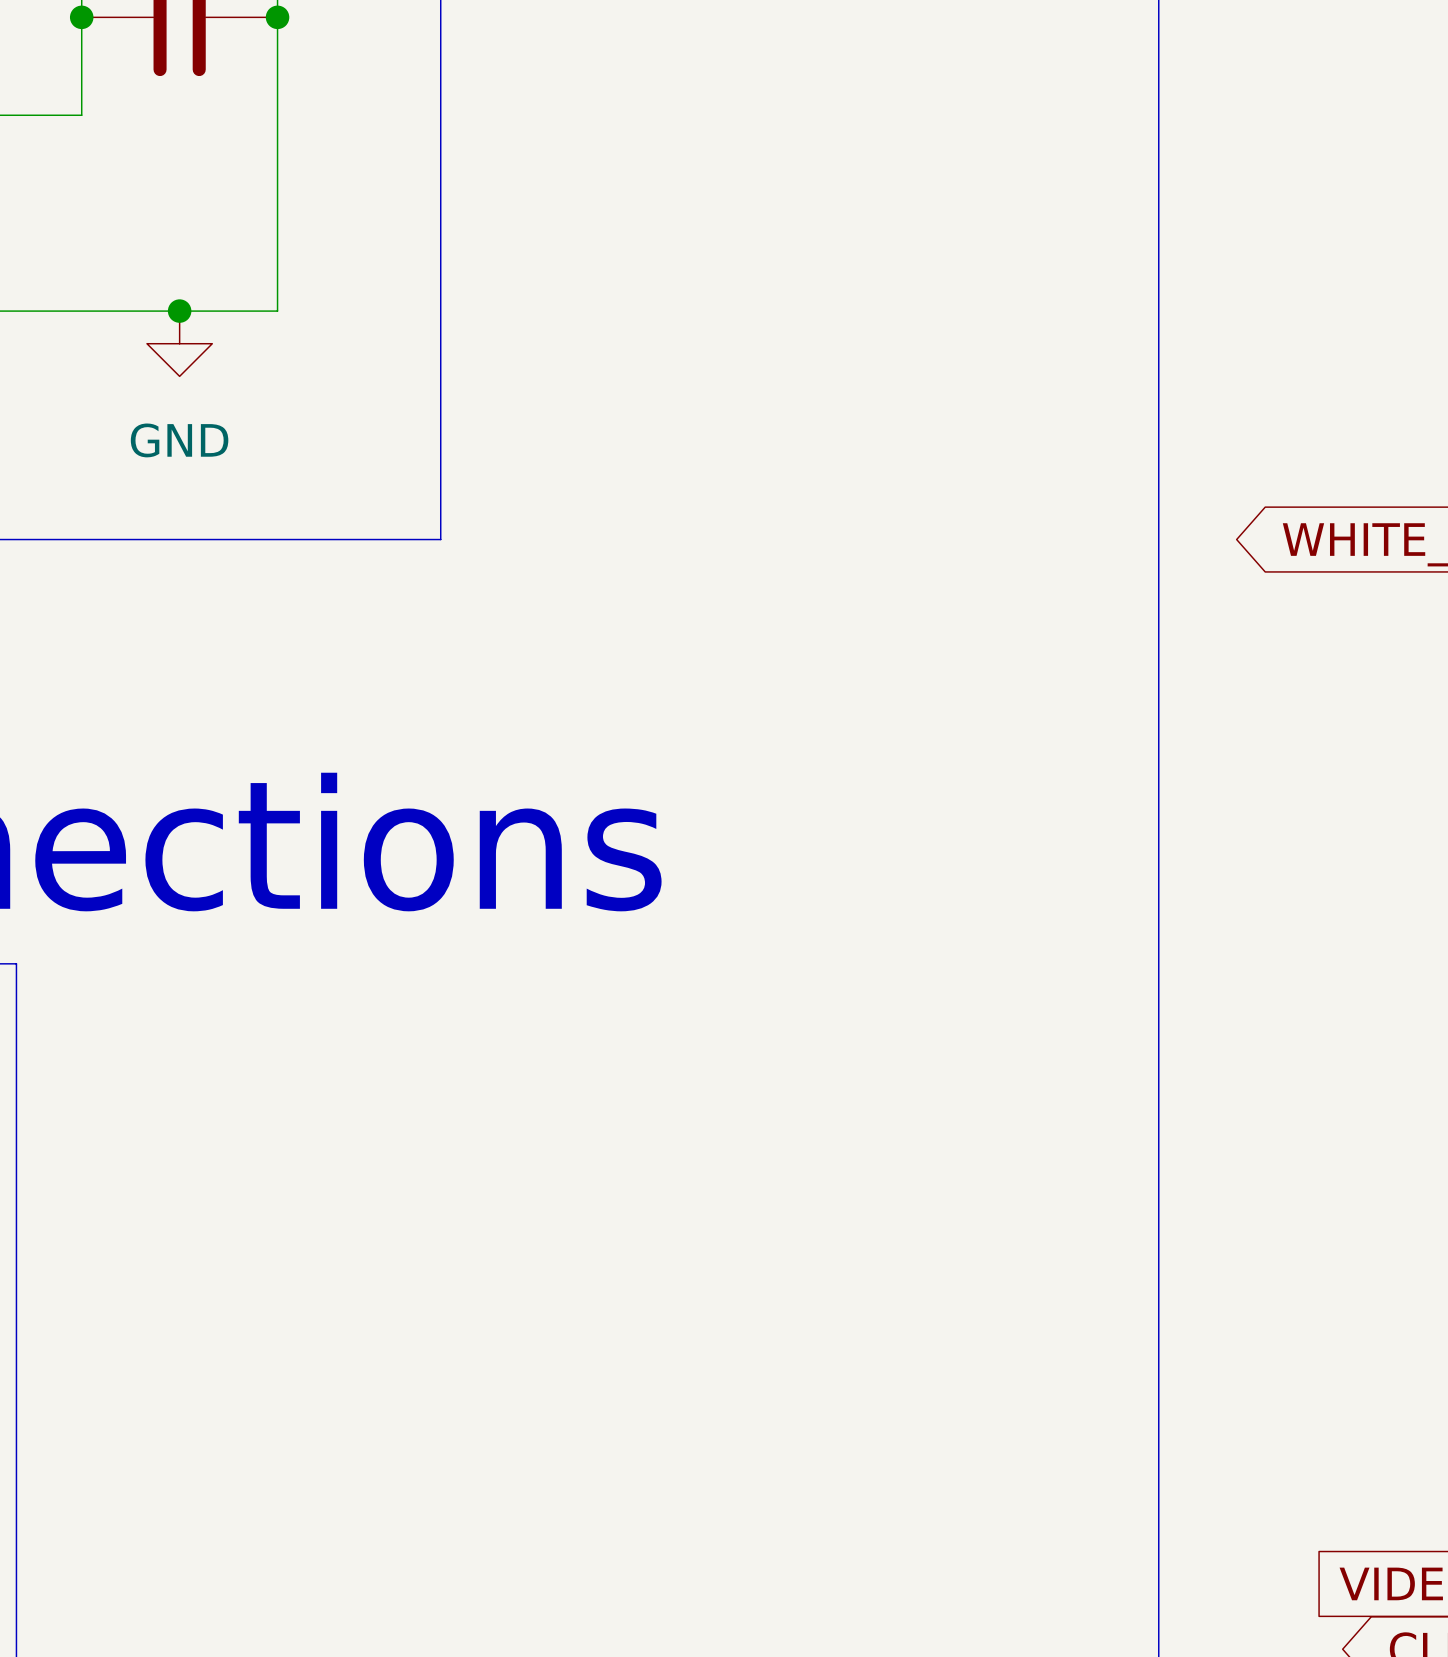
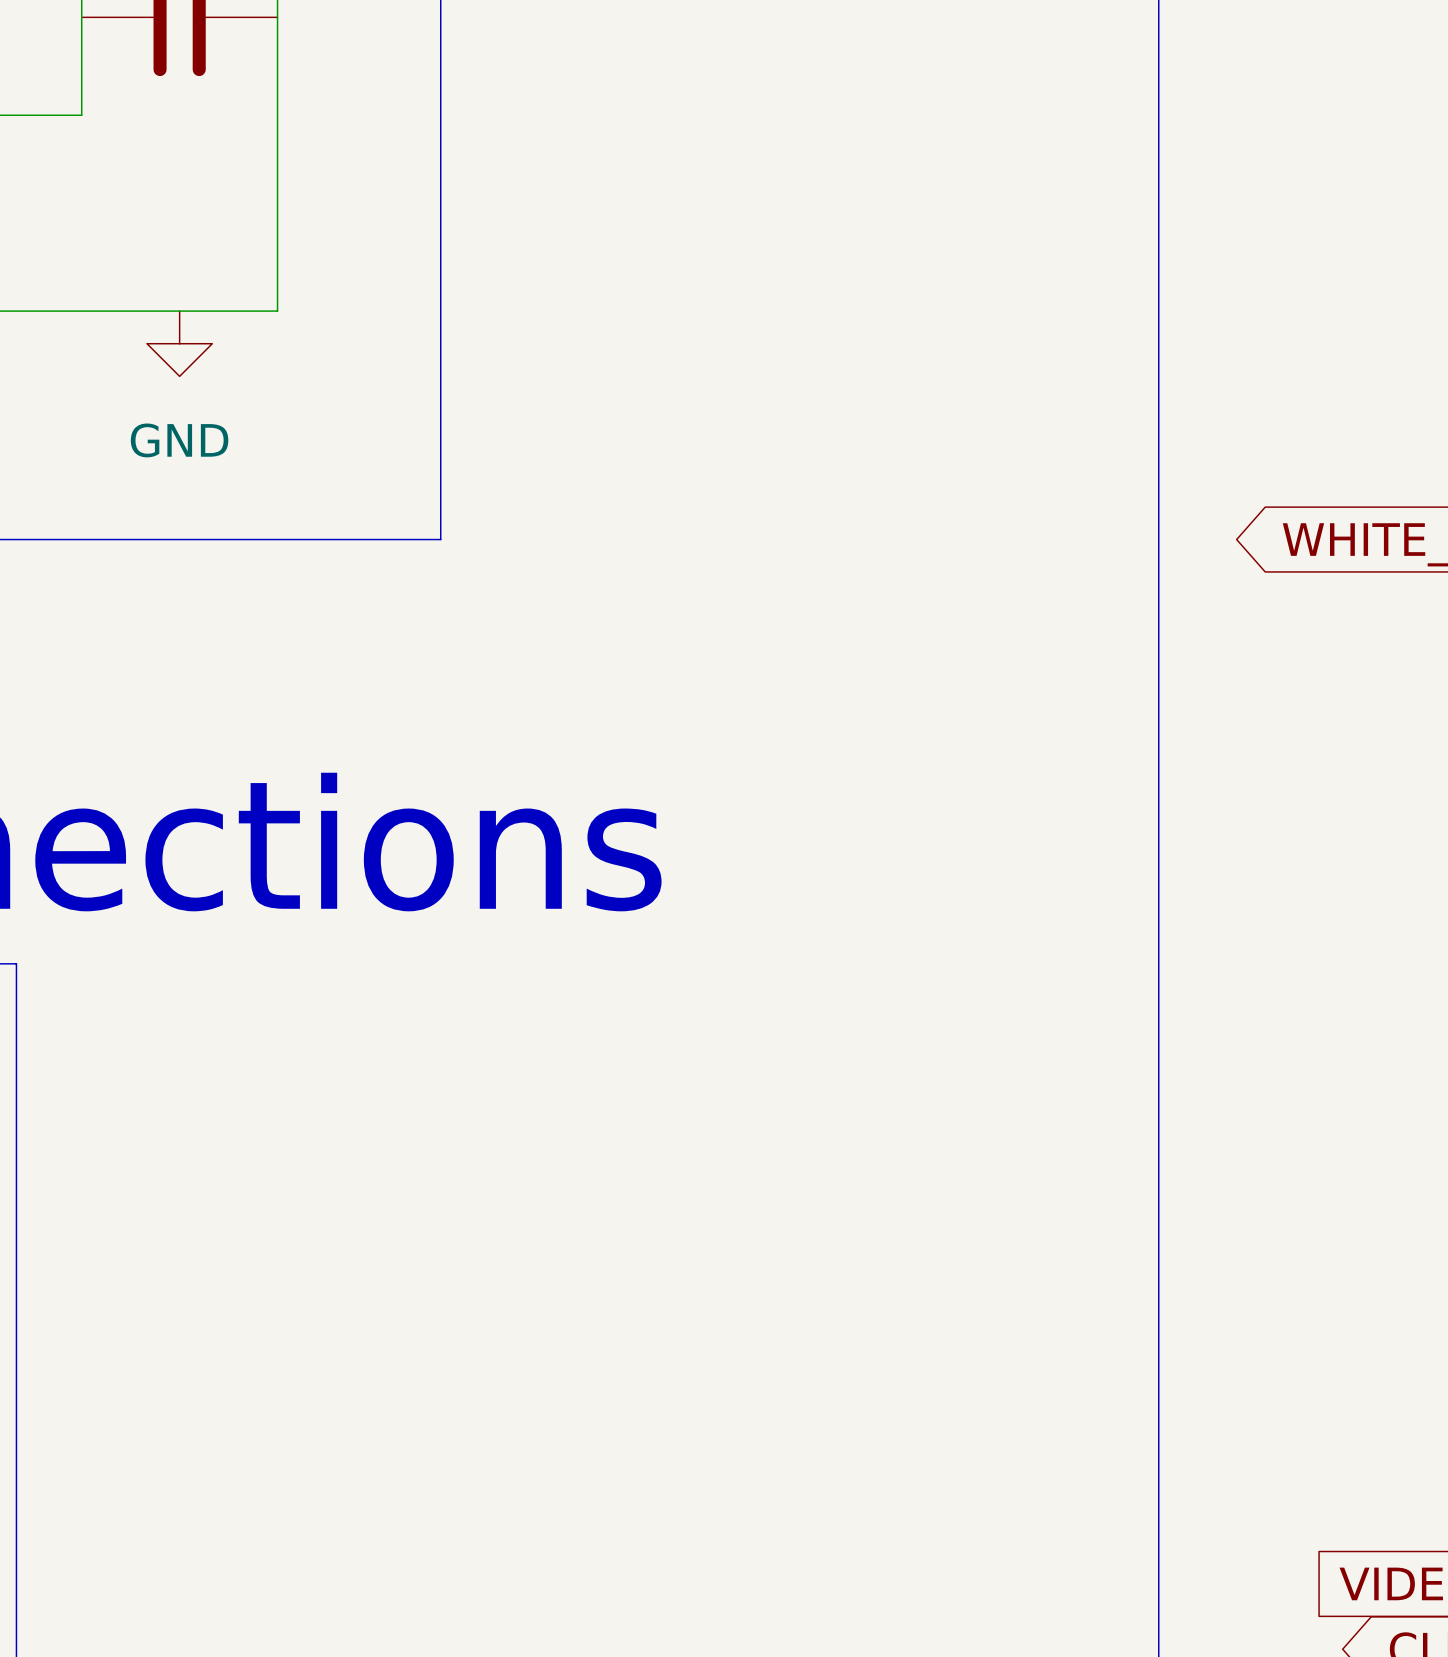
junction: (81, 17) -> none
junction: (277, 17) -> none
junction: (179, 311) -> none

